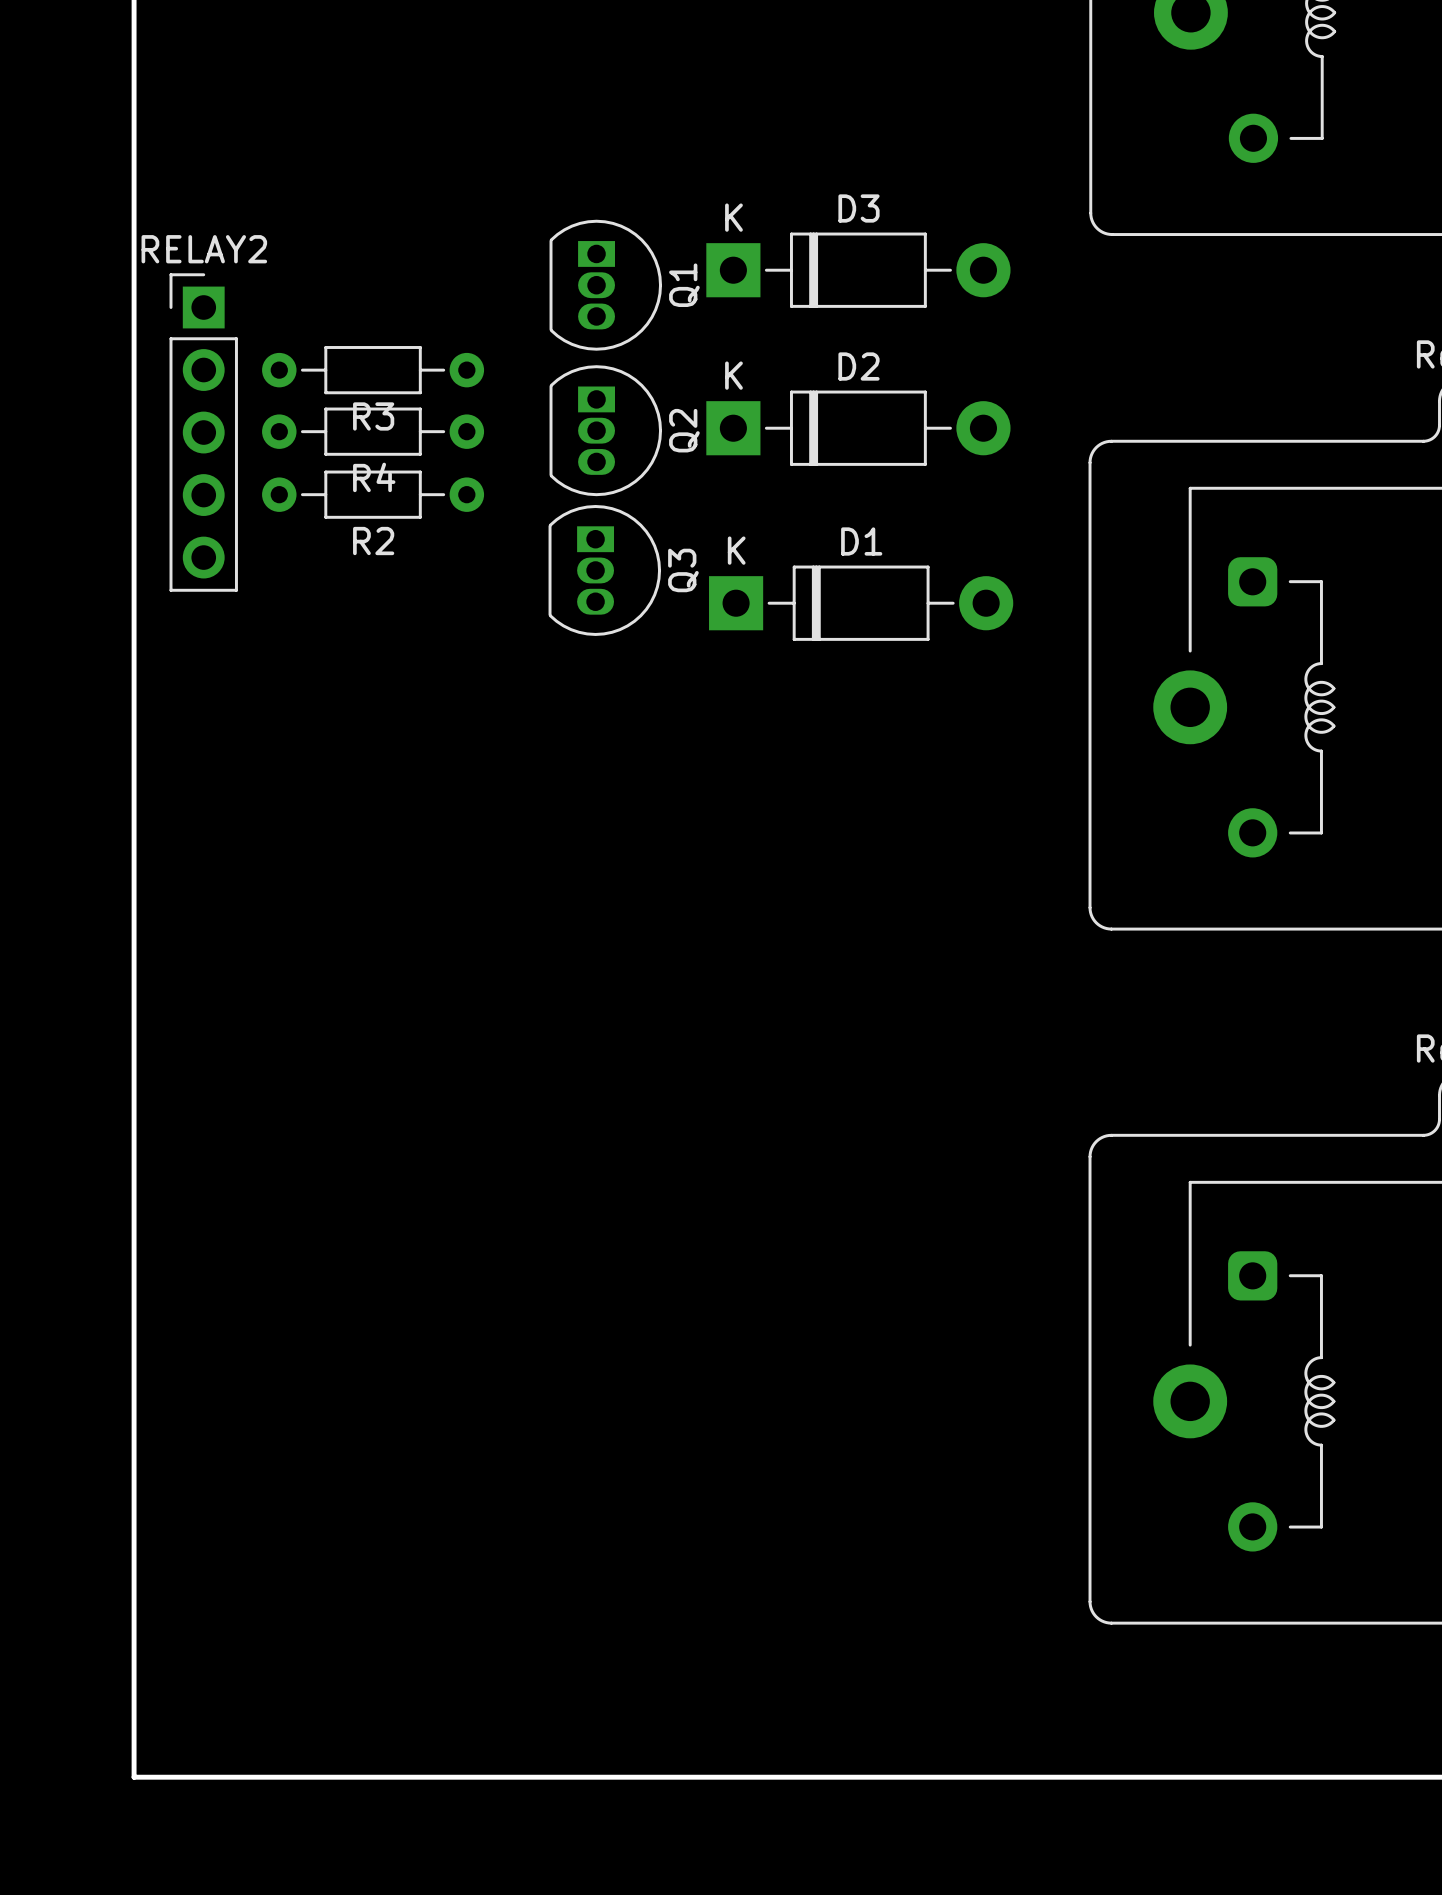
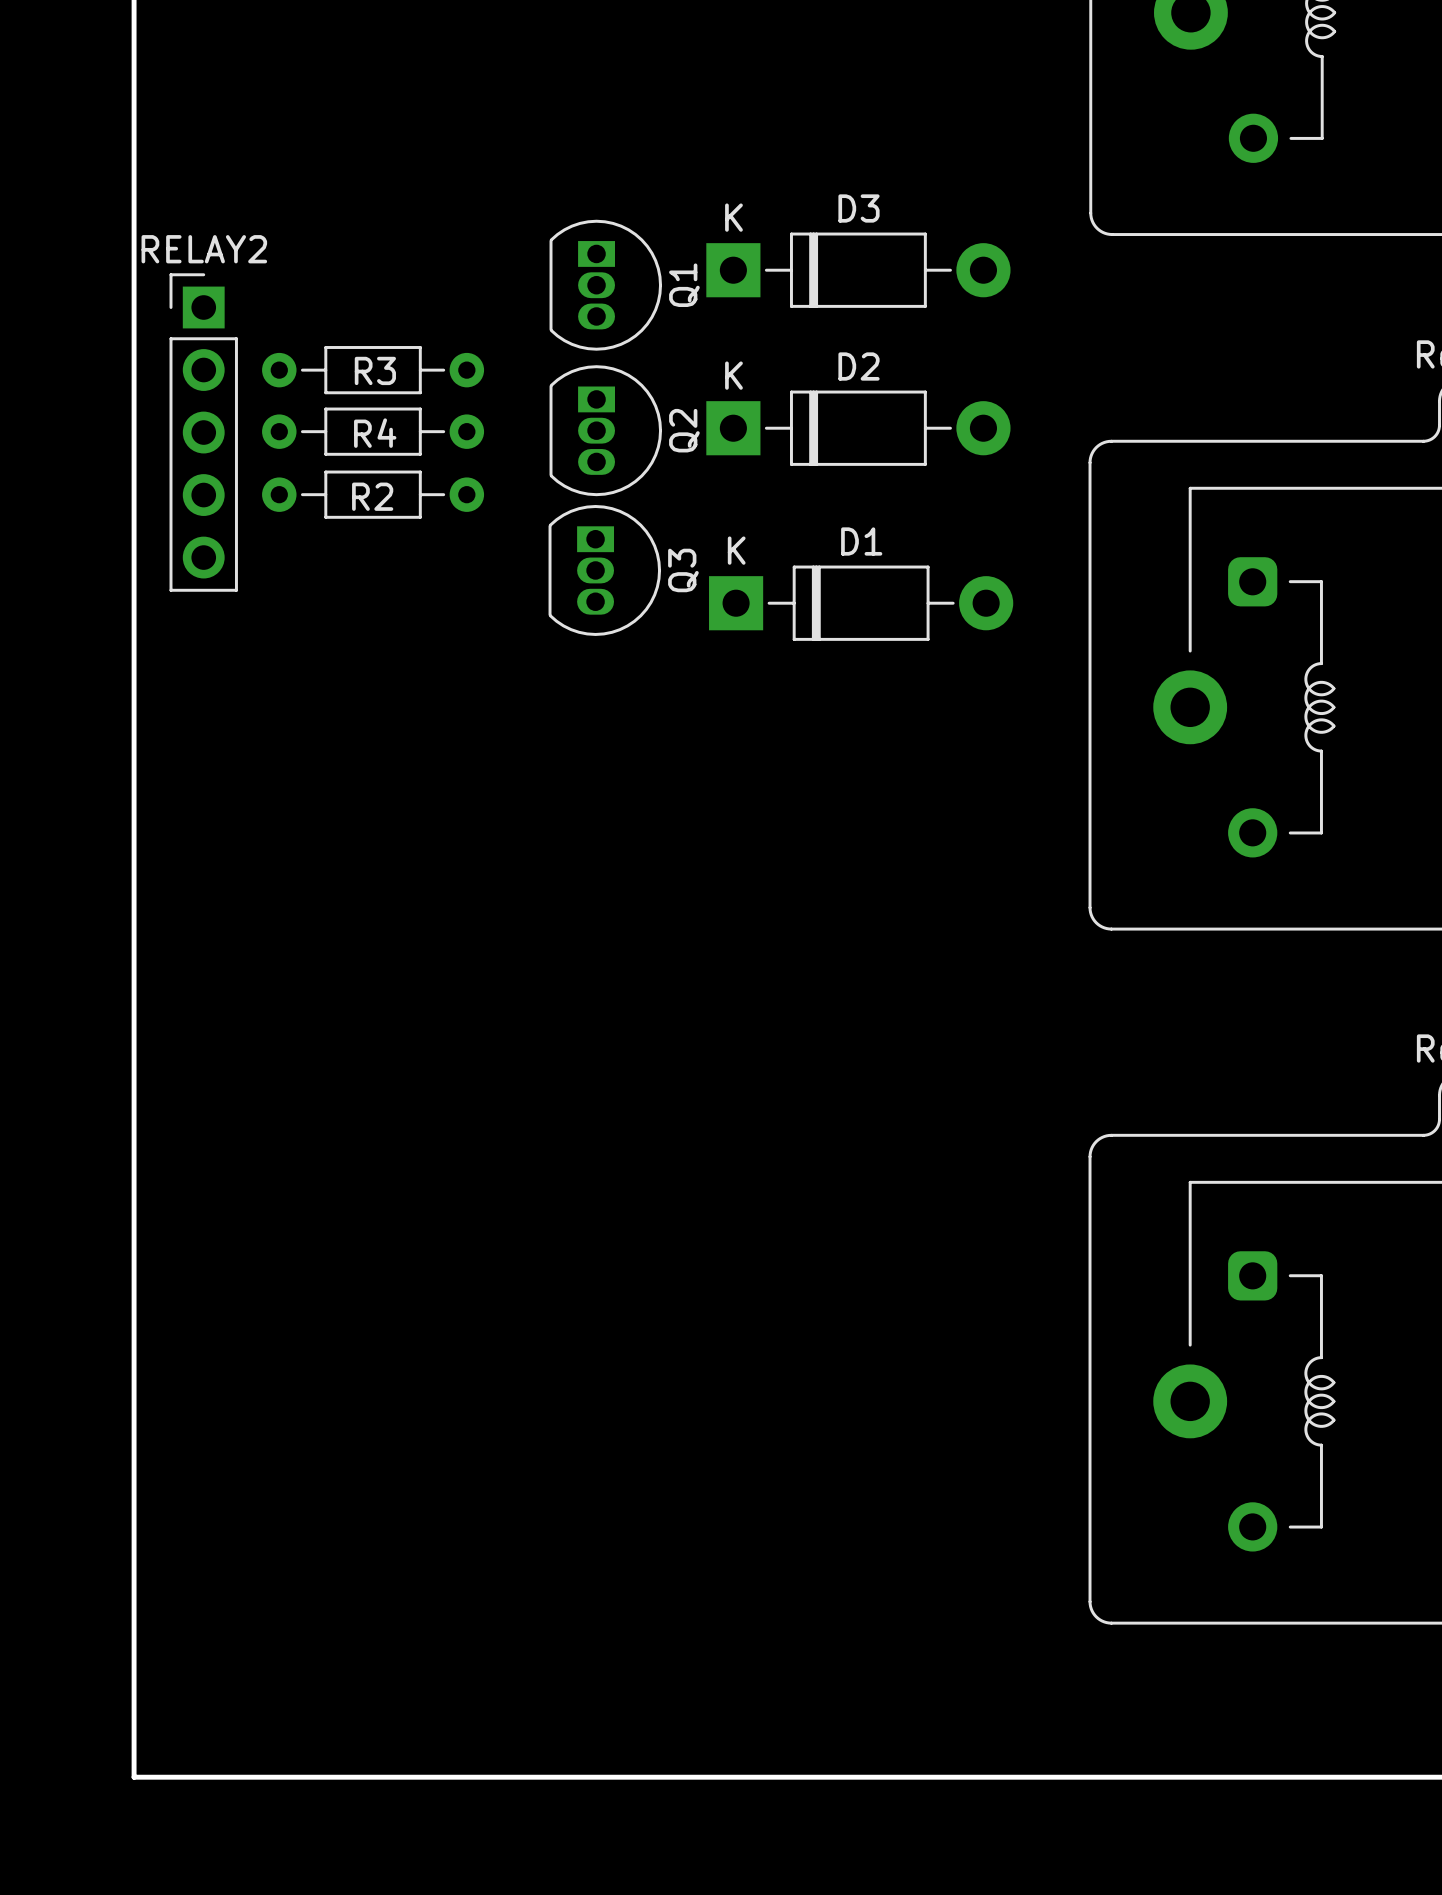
R3 name position: R3 (373, 416) -> R3 (375, 370)
R4 name position: R4 (374, 477) -> R4 (375, 433)
R2 name position: R2 (373, 541) -> R2 (372, 496)

